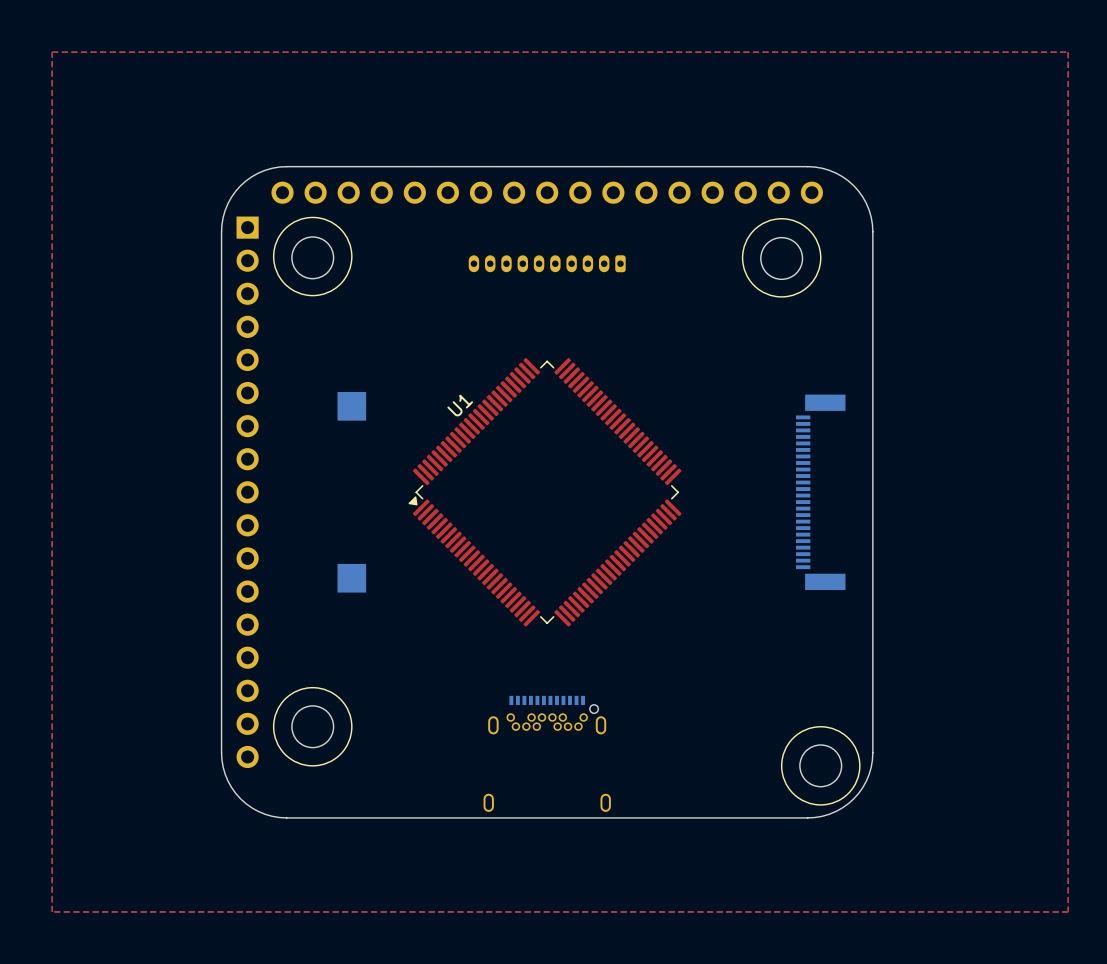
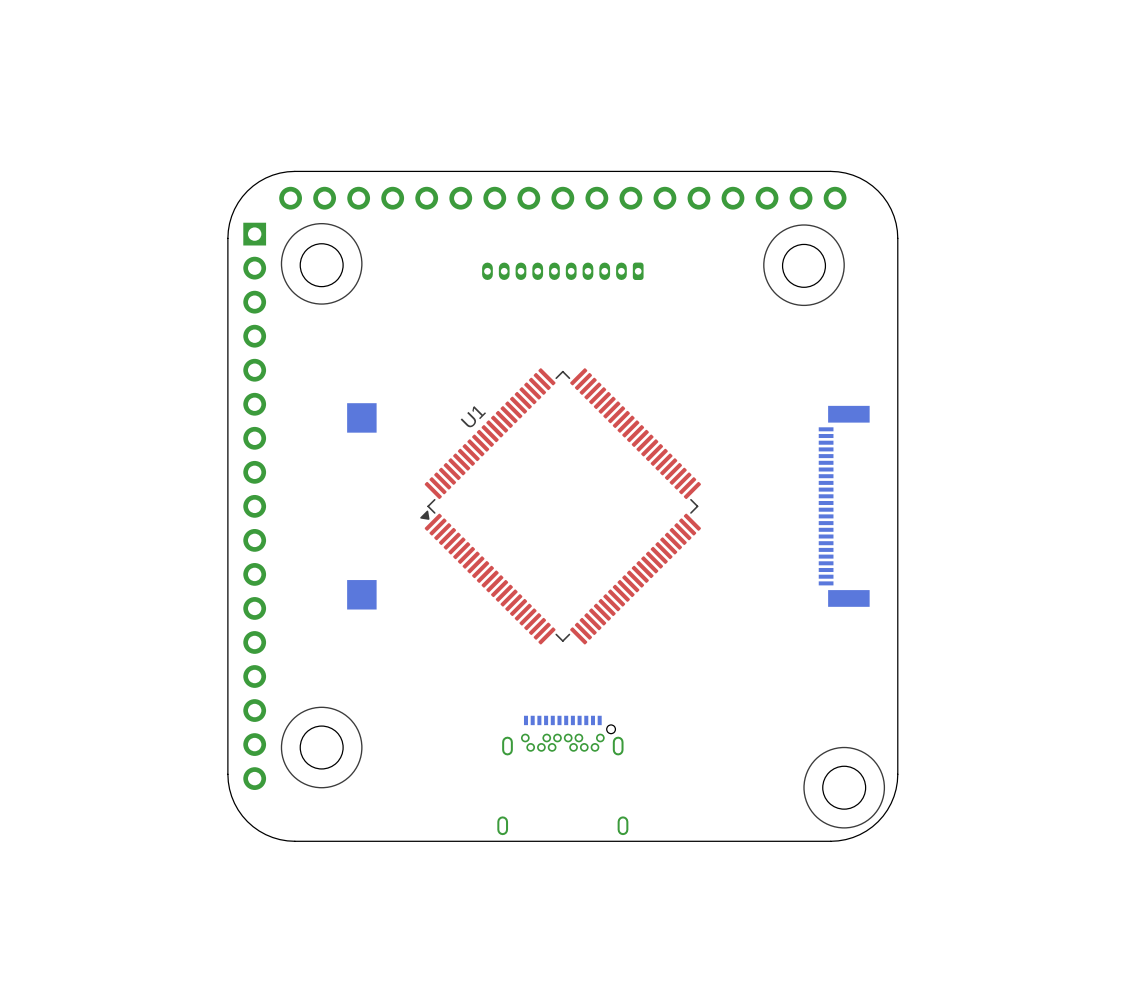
top zone outline: (52, 52) (1068, 52) (1068, 911) (52, 911) (52, 52) -> none

